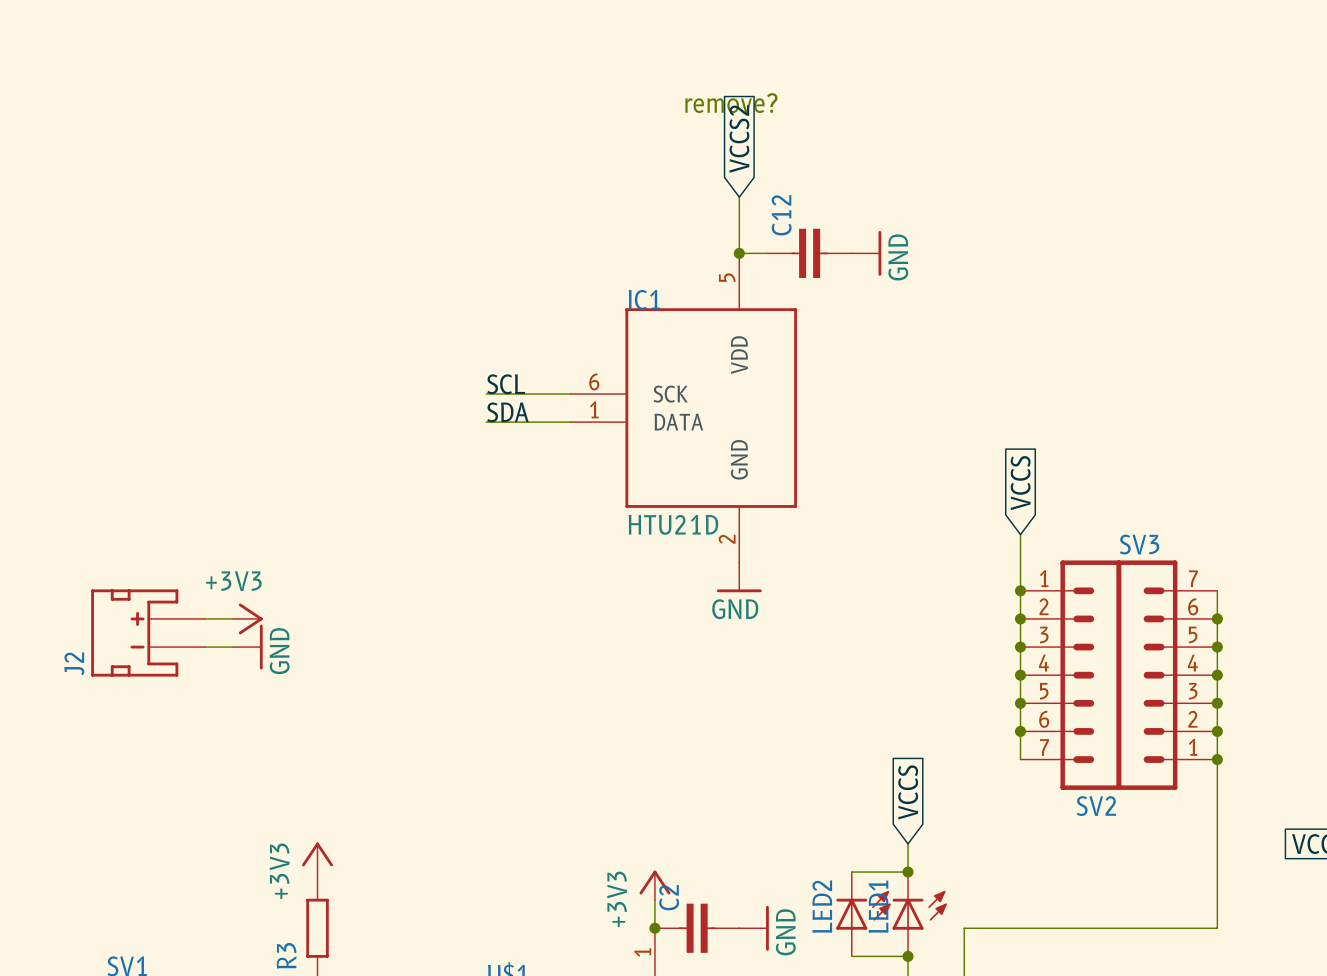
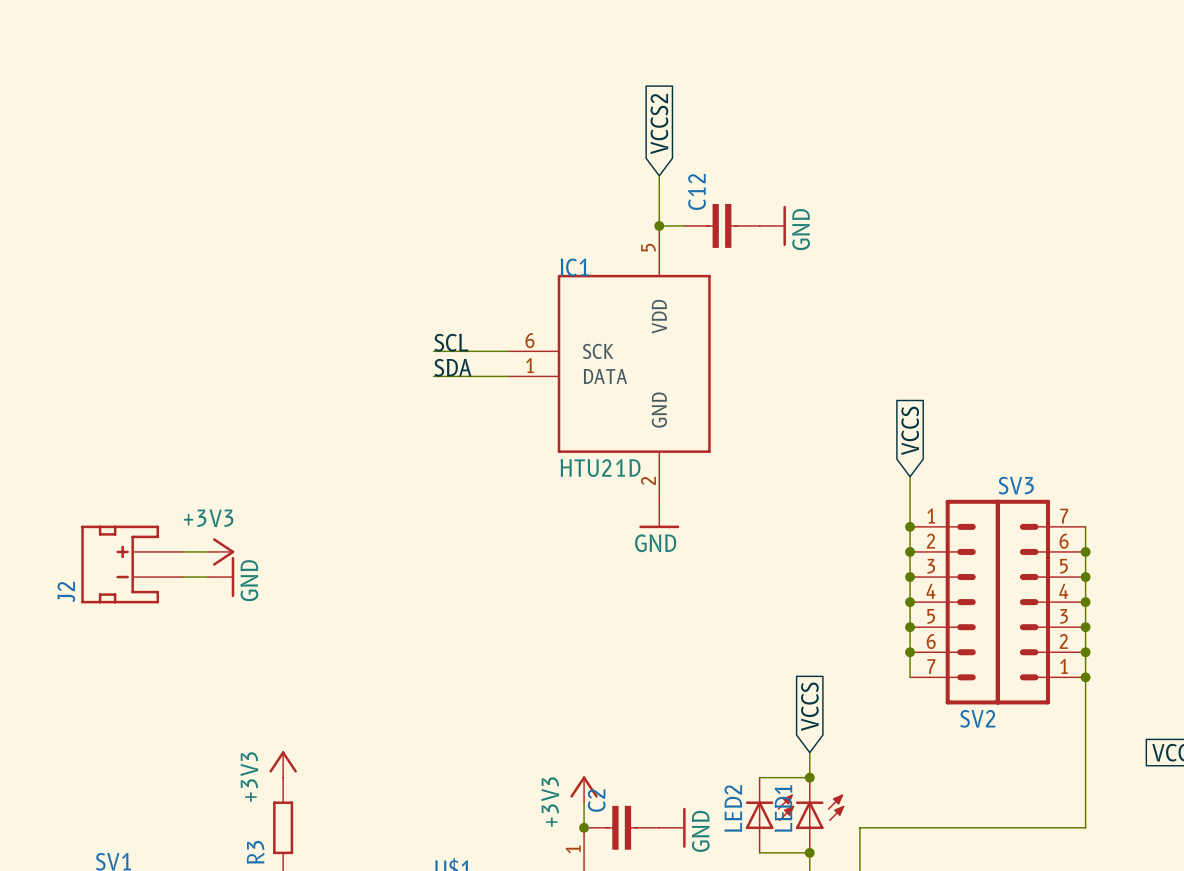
text: remove? (731, 103) -> none

